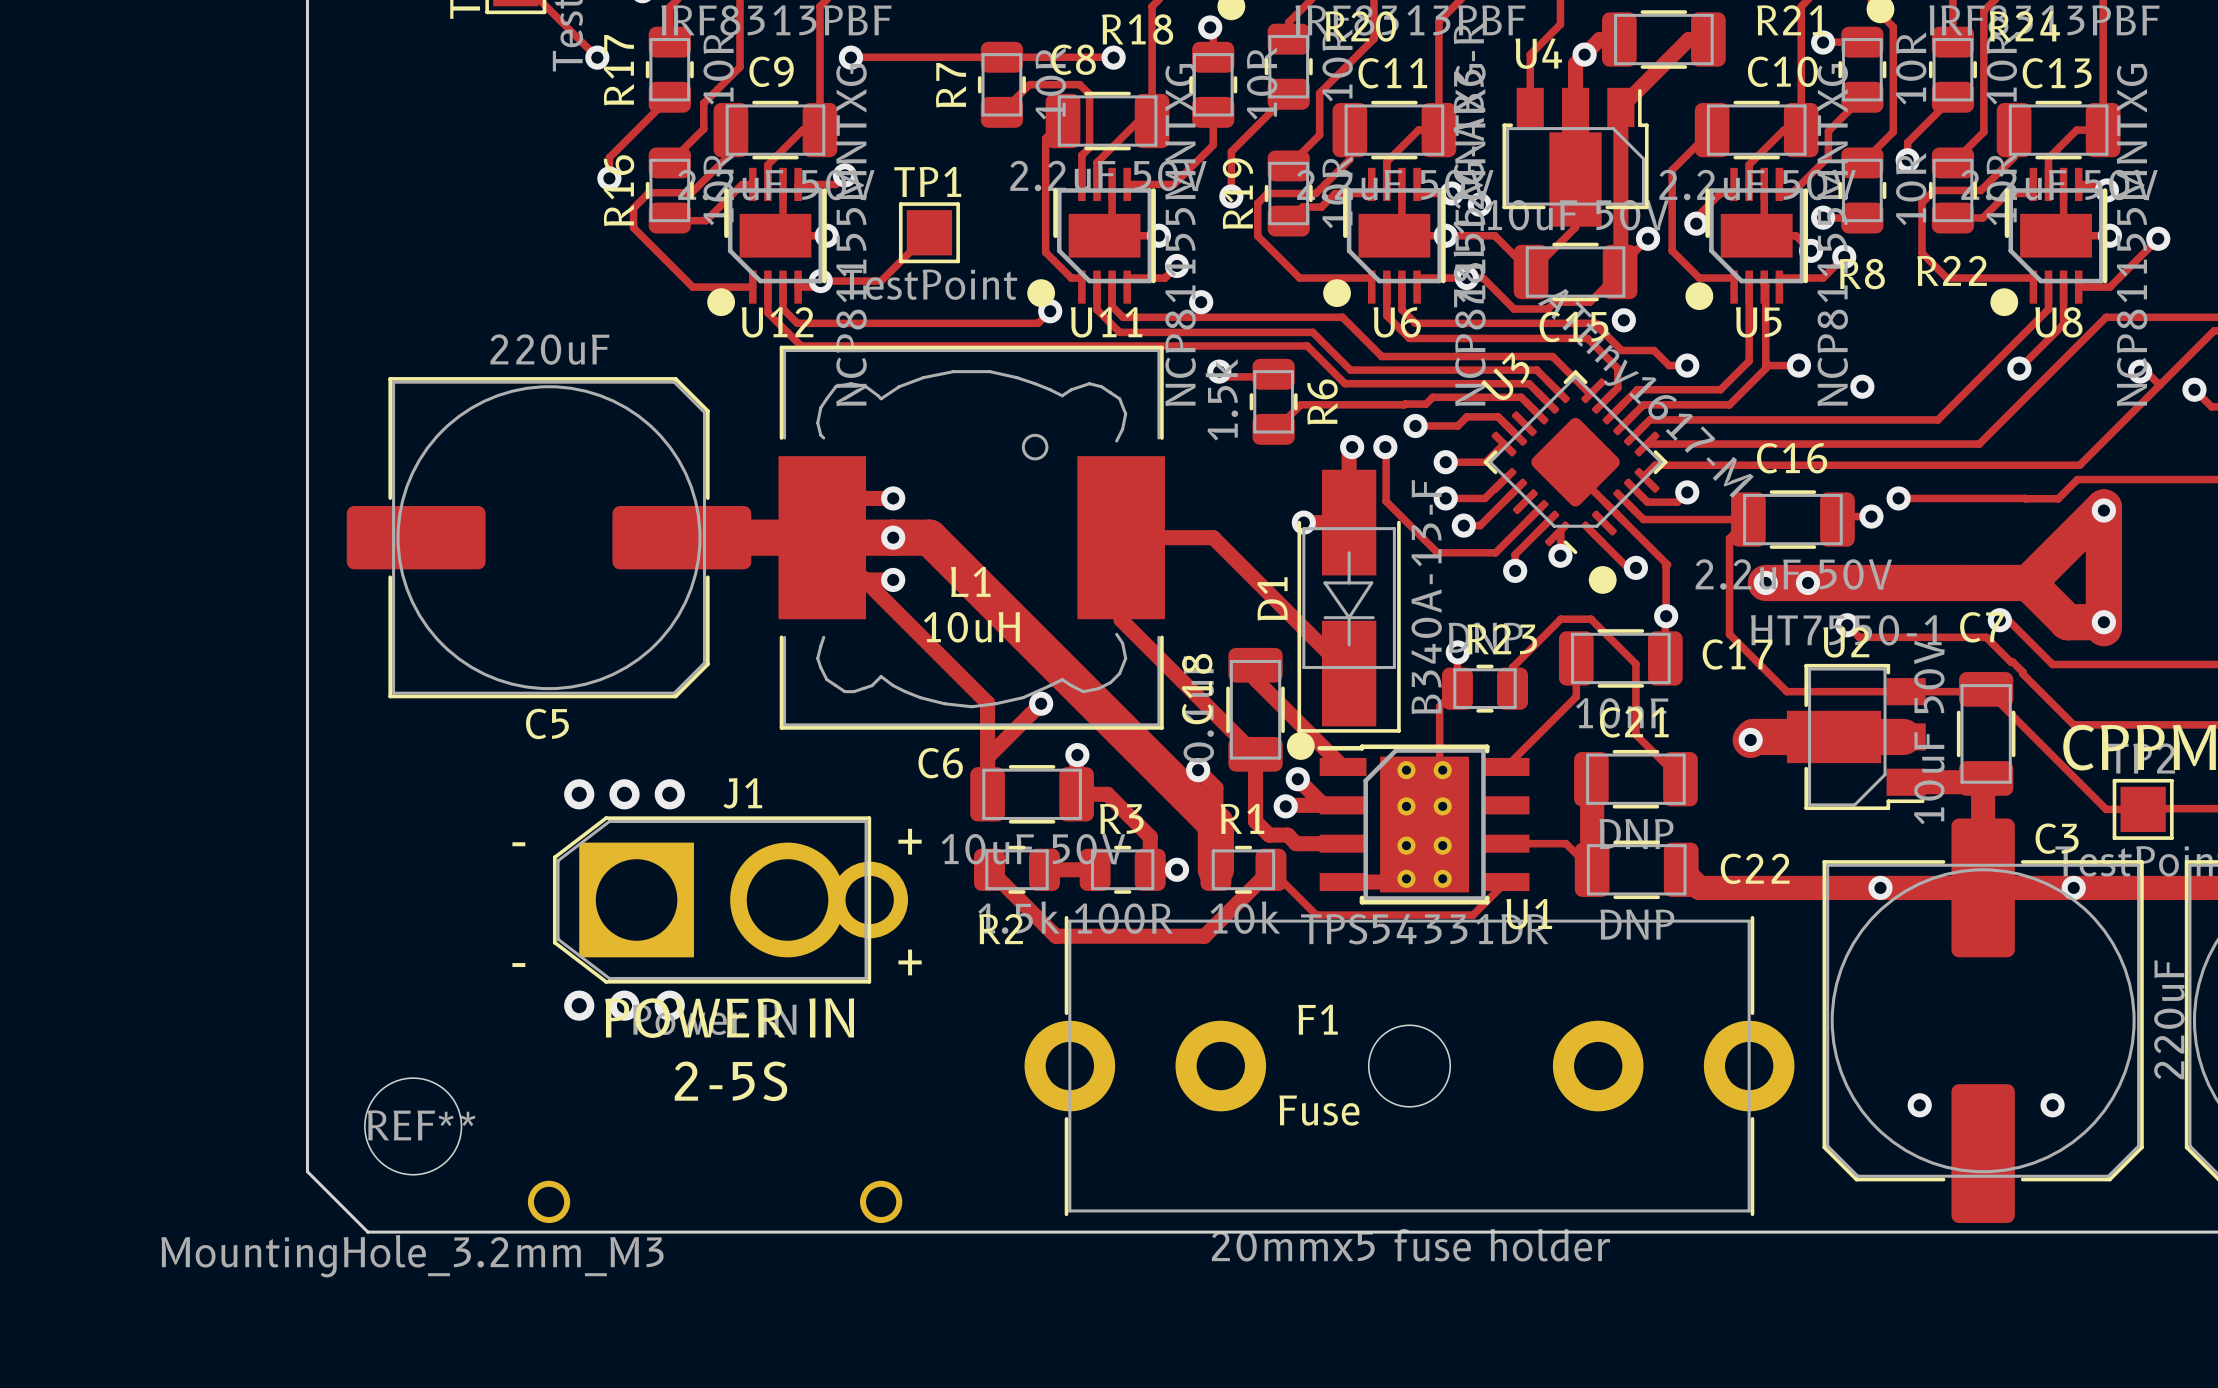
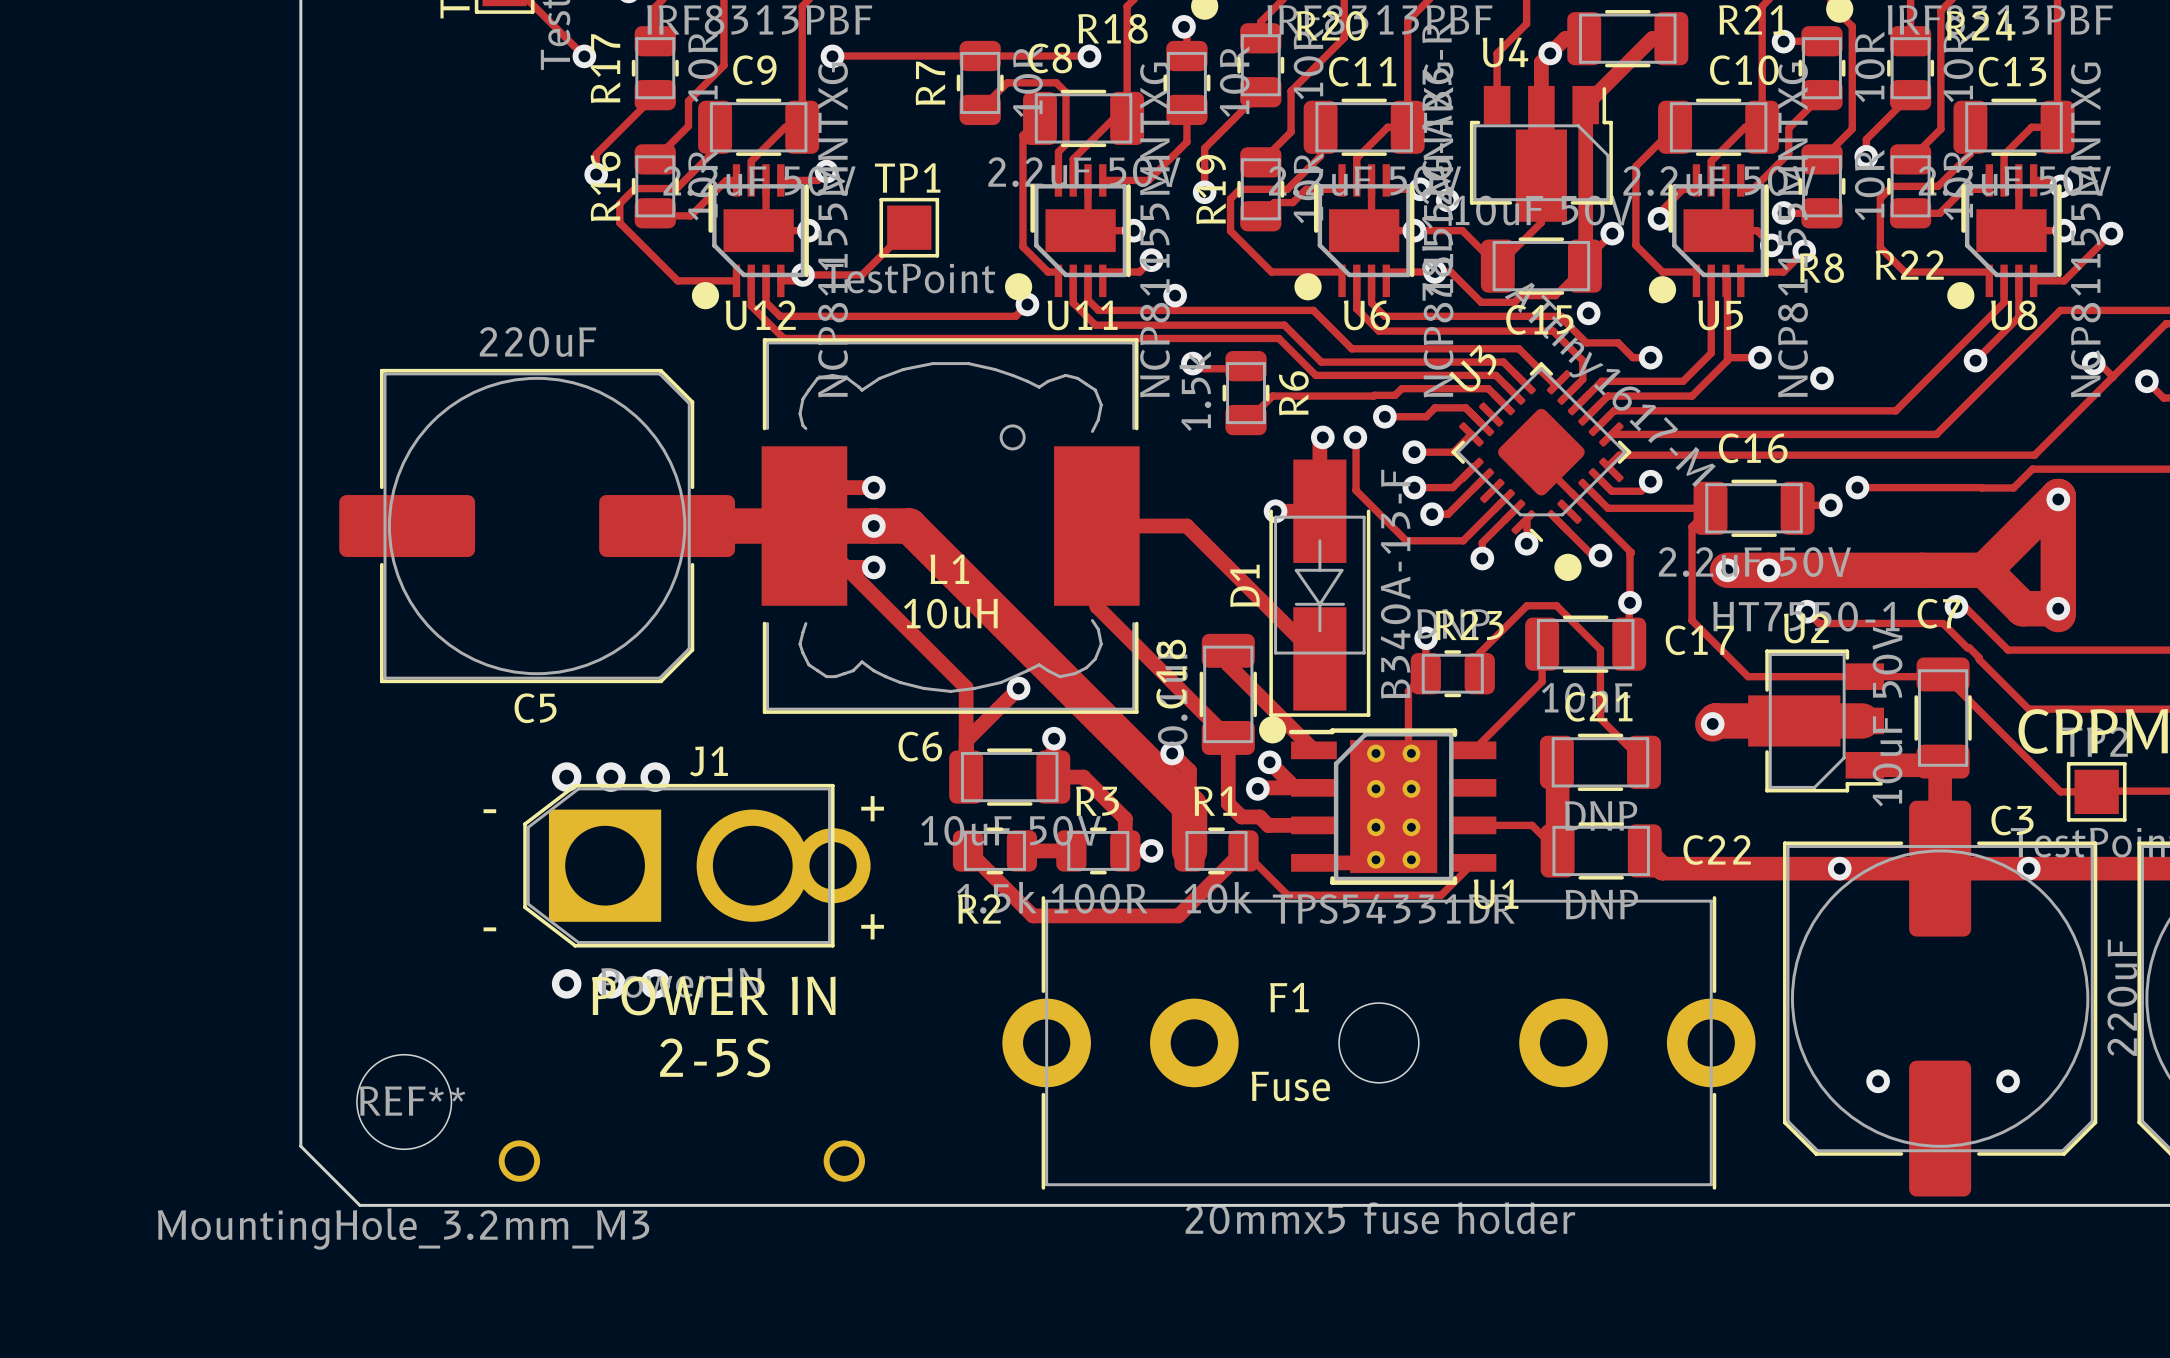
J1 position: (717, 1019) -> (684, 982)

